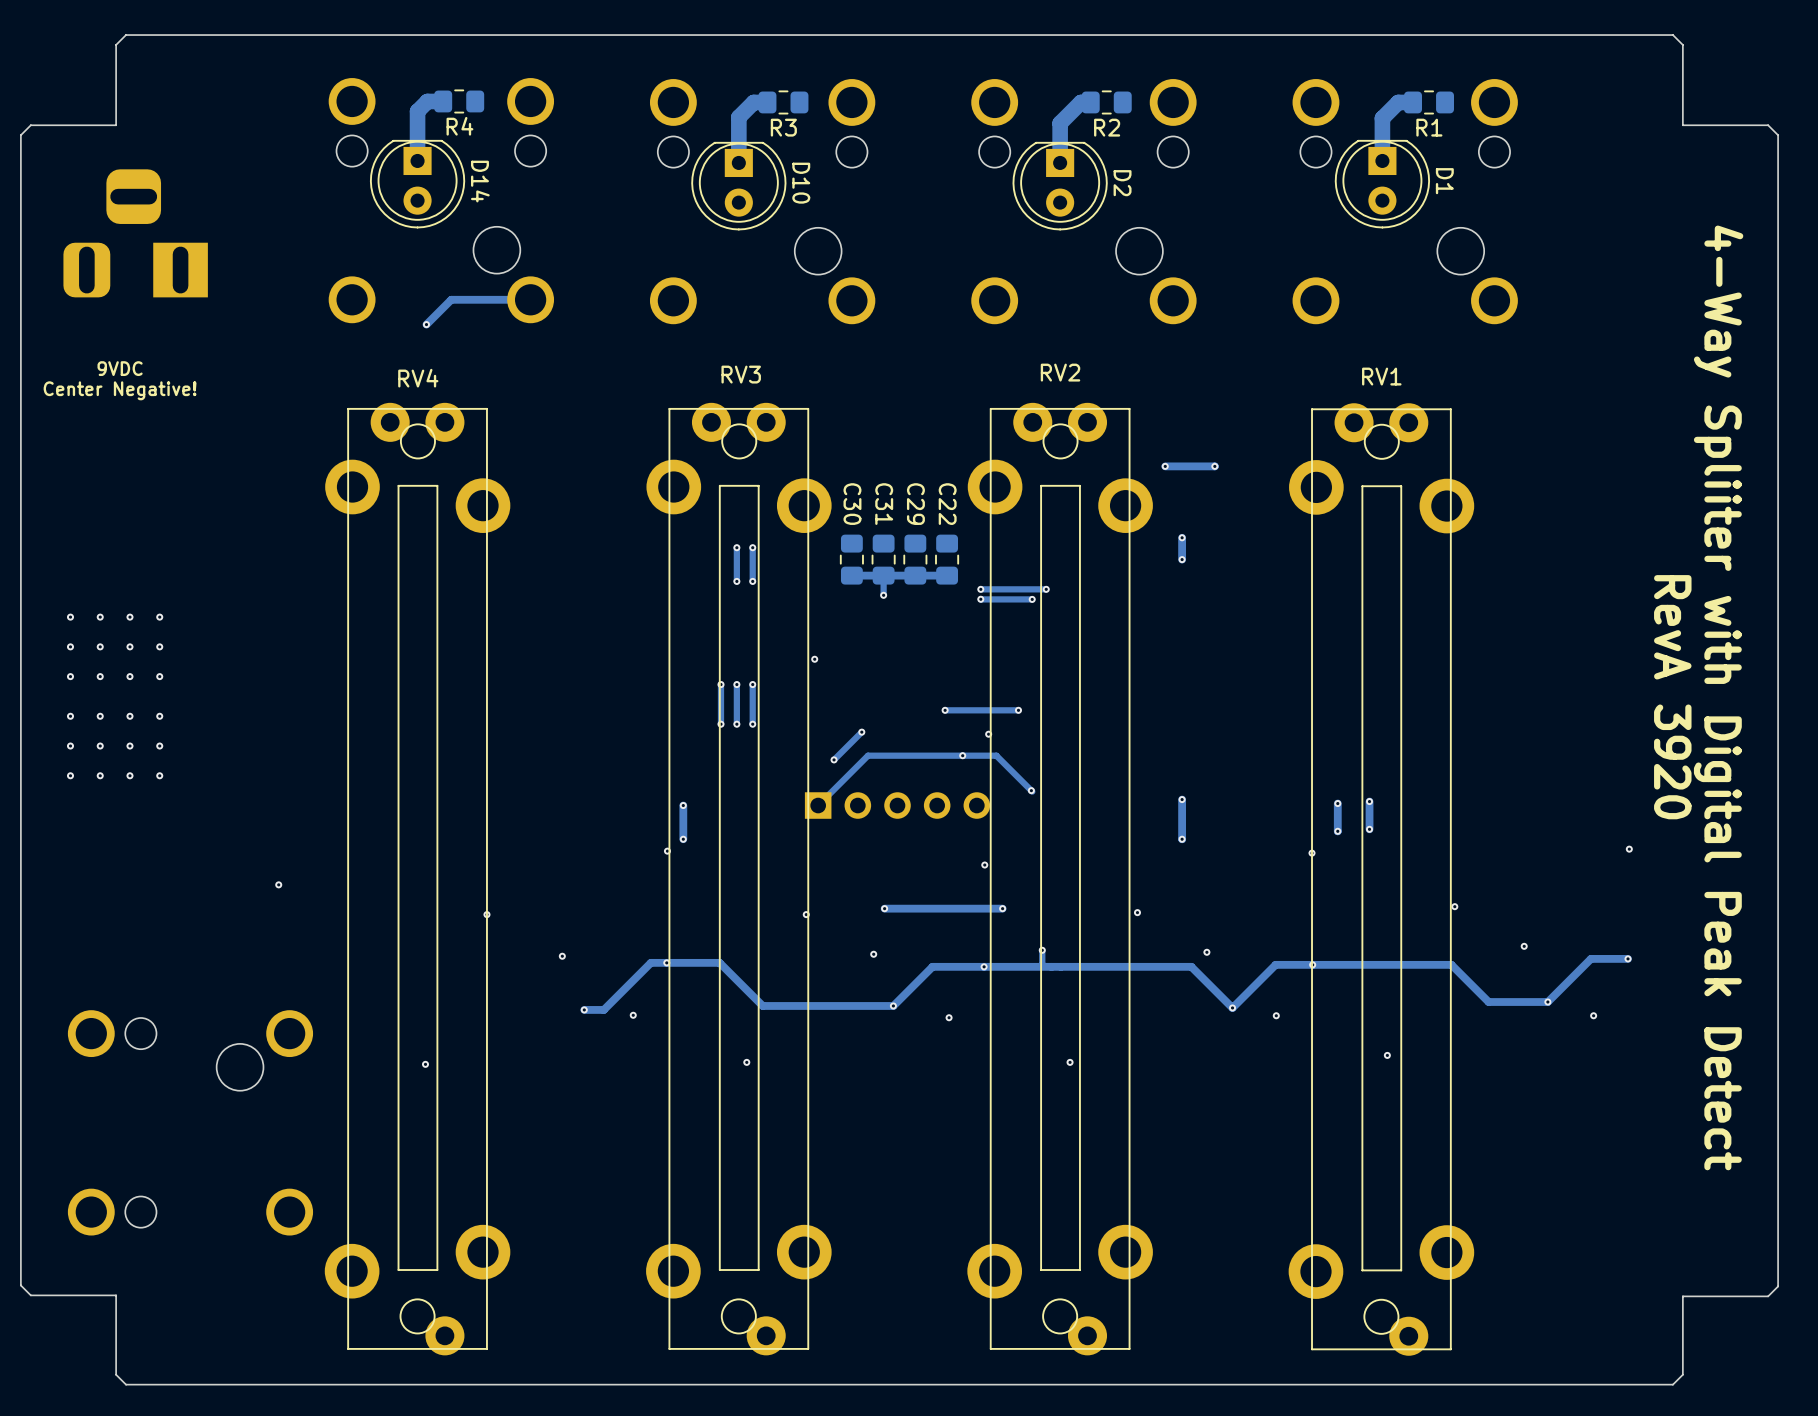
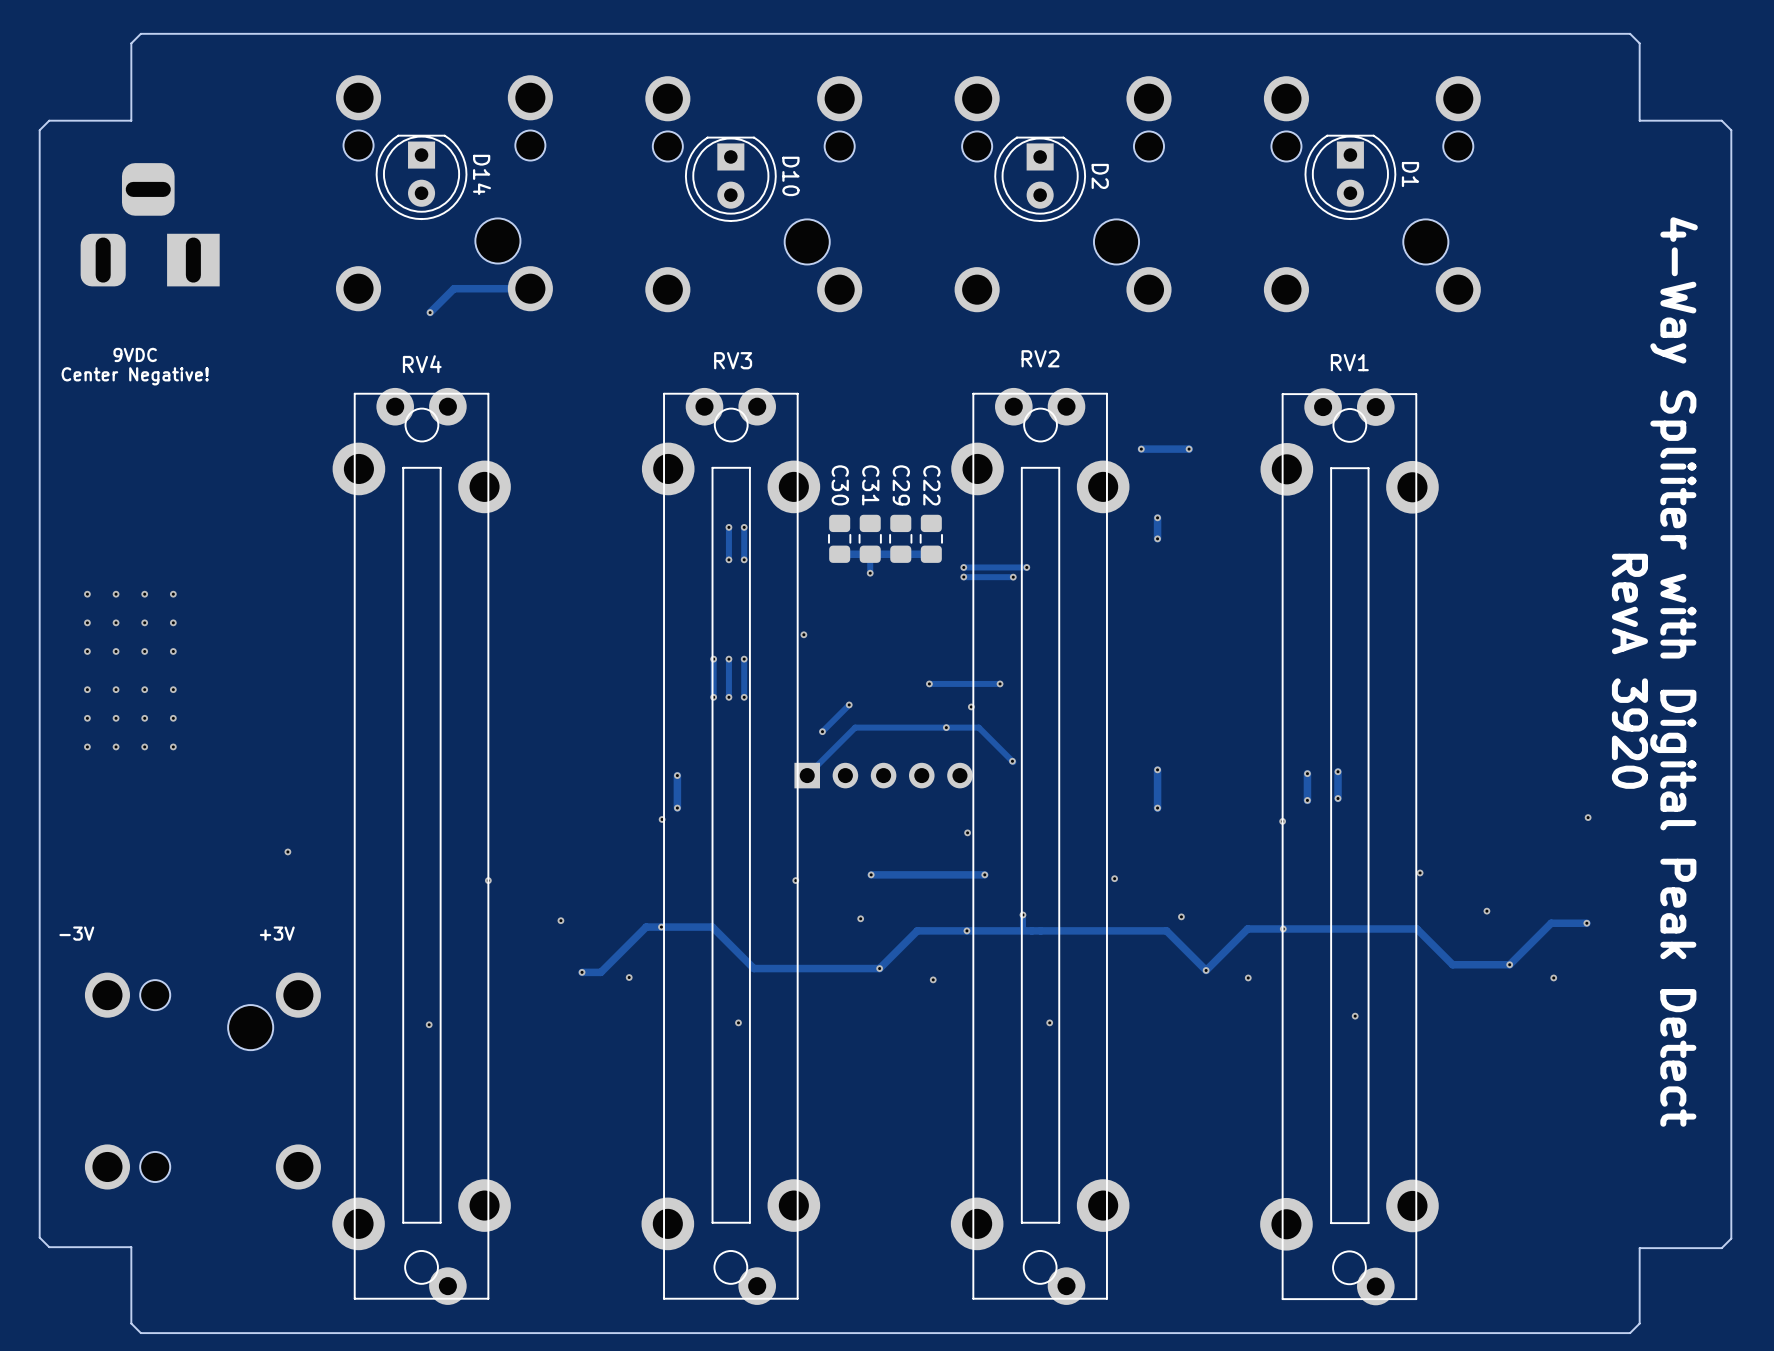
track: (443, 101) (427, 101) (417, 111) (417, 160) -> none
R4: (459, 101) -> none
track: (767, 102) (753, 102) (738, 117) (738, 162) -> none
R3: (783, 102) -> none
track: (1090, 102) (1080, 102) (1060, 123) (1060, 162) -> none
R2: (1106, 102) -> none
track: (1413, 102) (1398, 102) (1382, 118) (1382, 160) -> none
R1: (1429, 102) -> none
text: none -> -3V (76, 933)
text: none -> +3V (277, 933)

